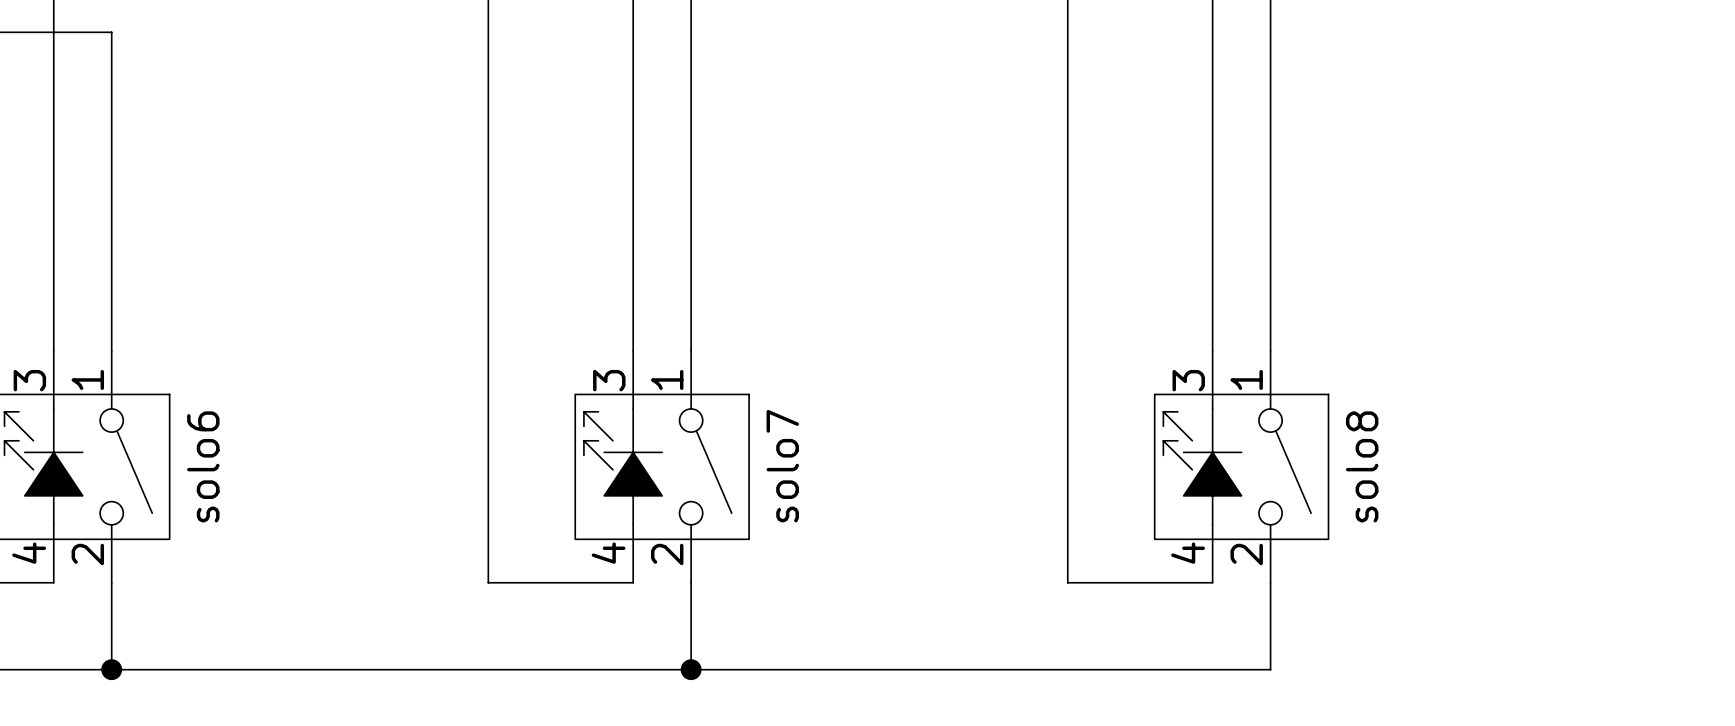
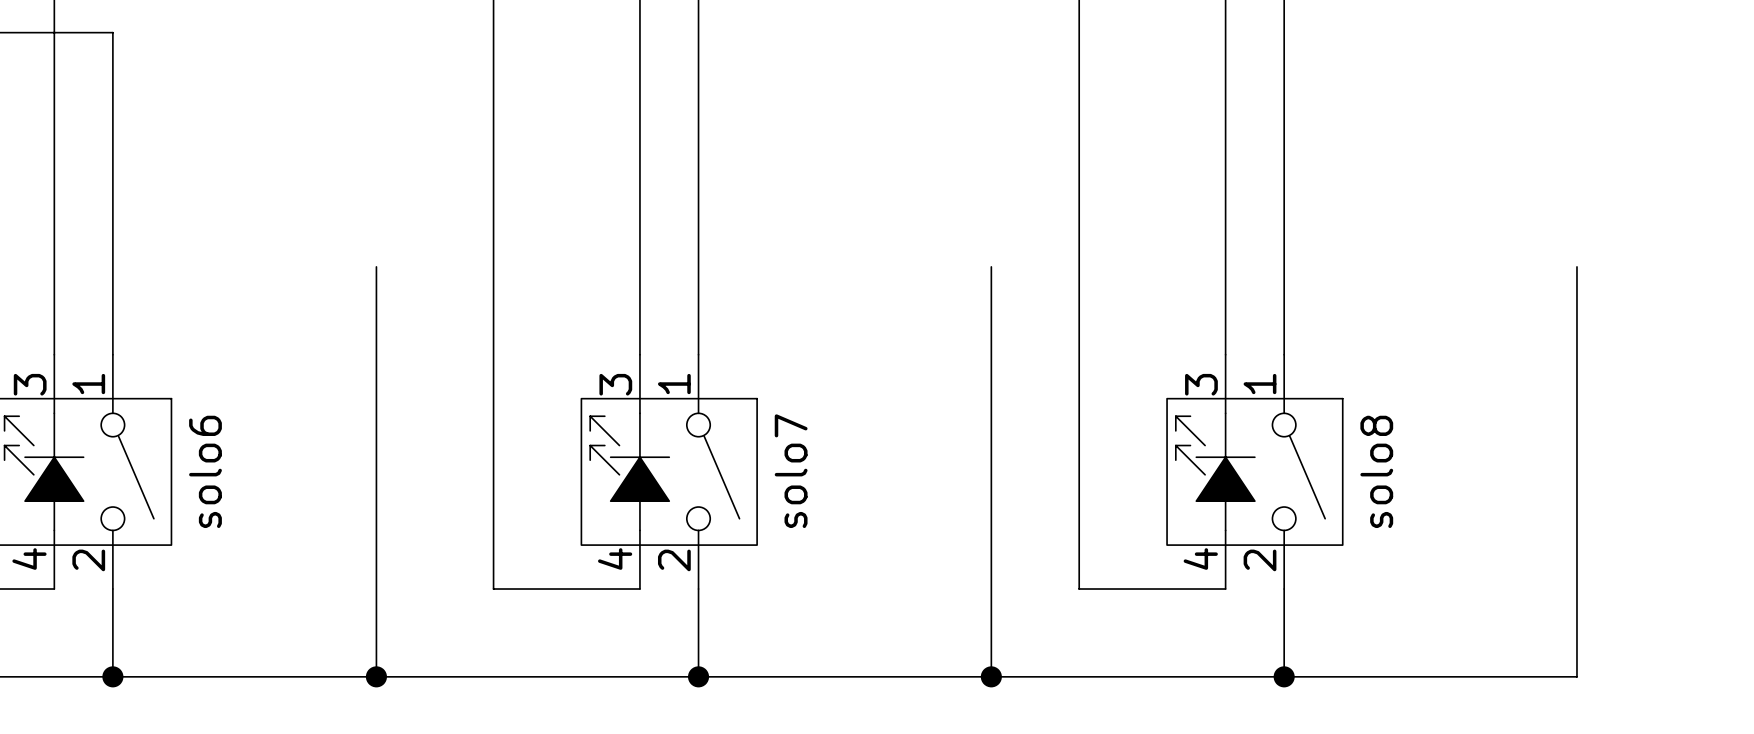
wire: none -> (376, 266) (376, 676)
wire: none -> (991, 266) (991, 676)
wire: none -> (1576, 266) (1576, 676) (1284, 676)
junction: none -> (376, 676)
junction: none -> (991, 676)
junction: none -> (1284, 676)

